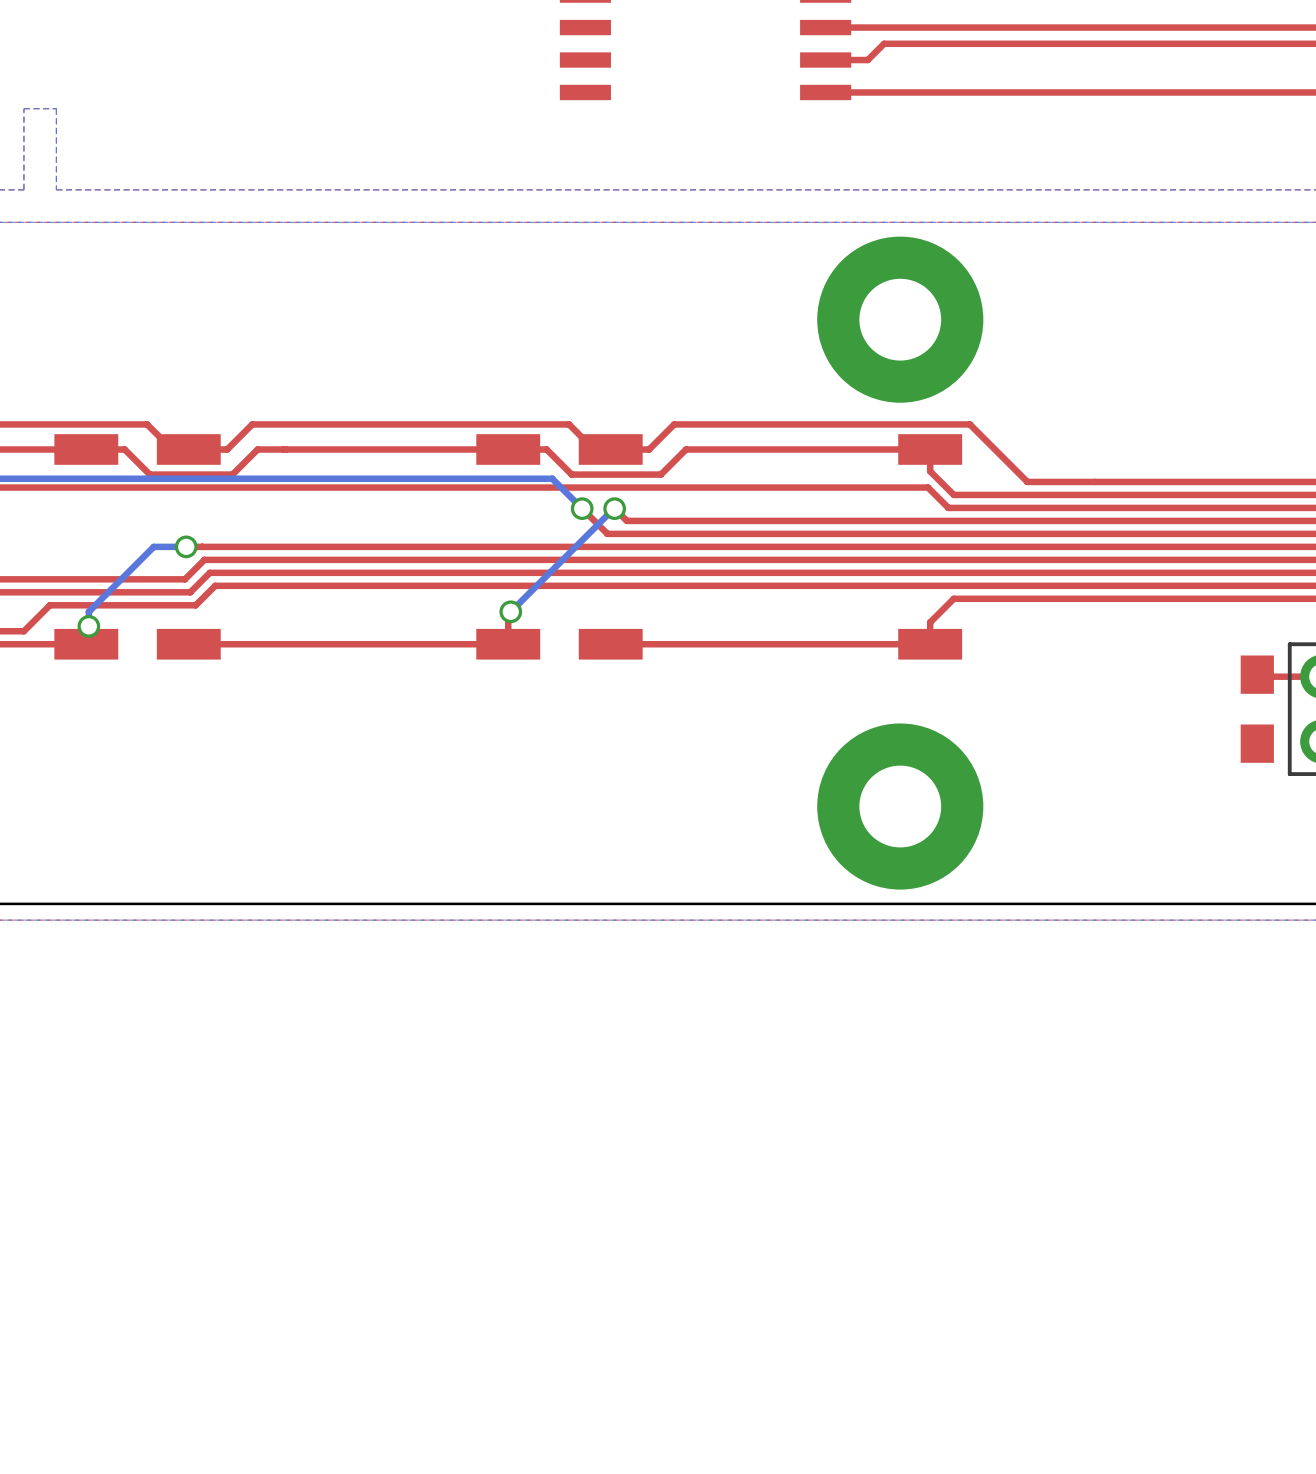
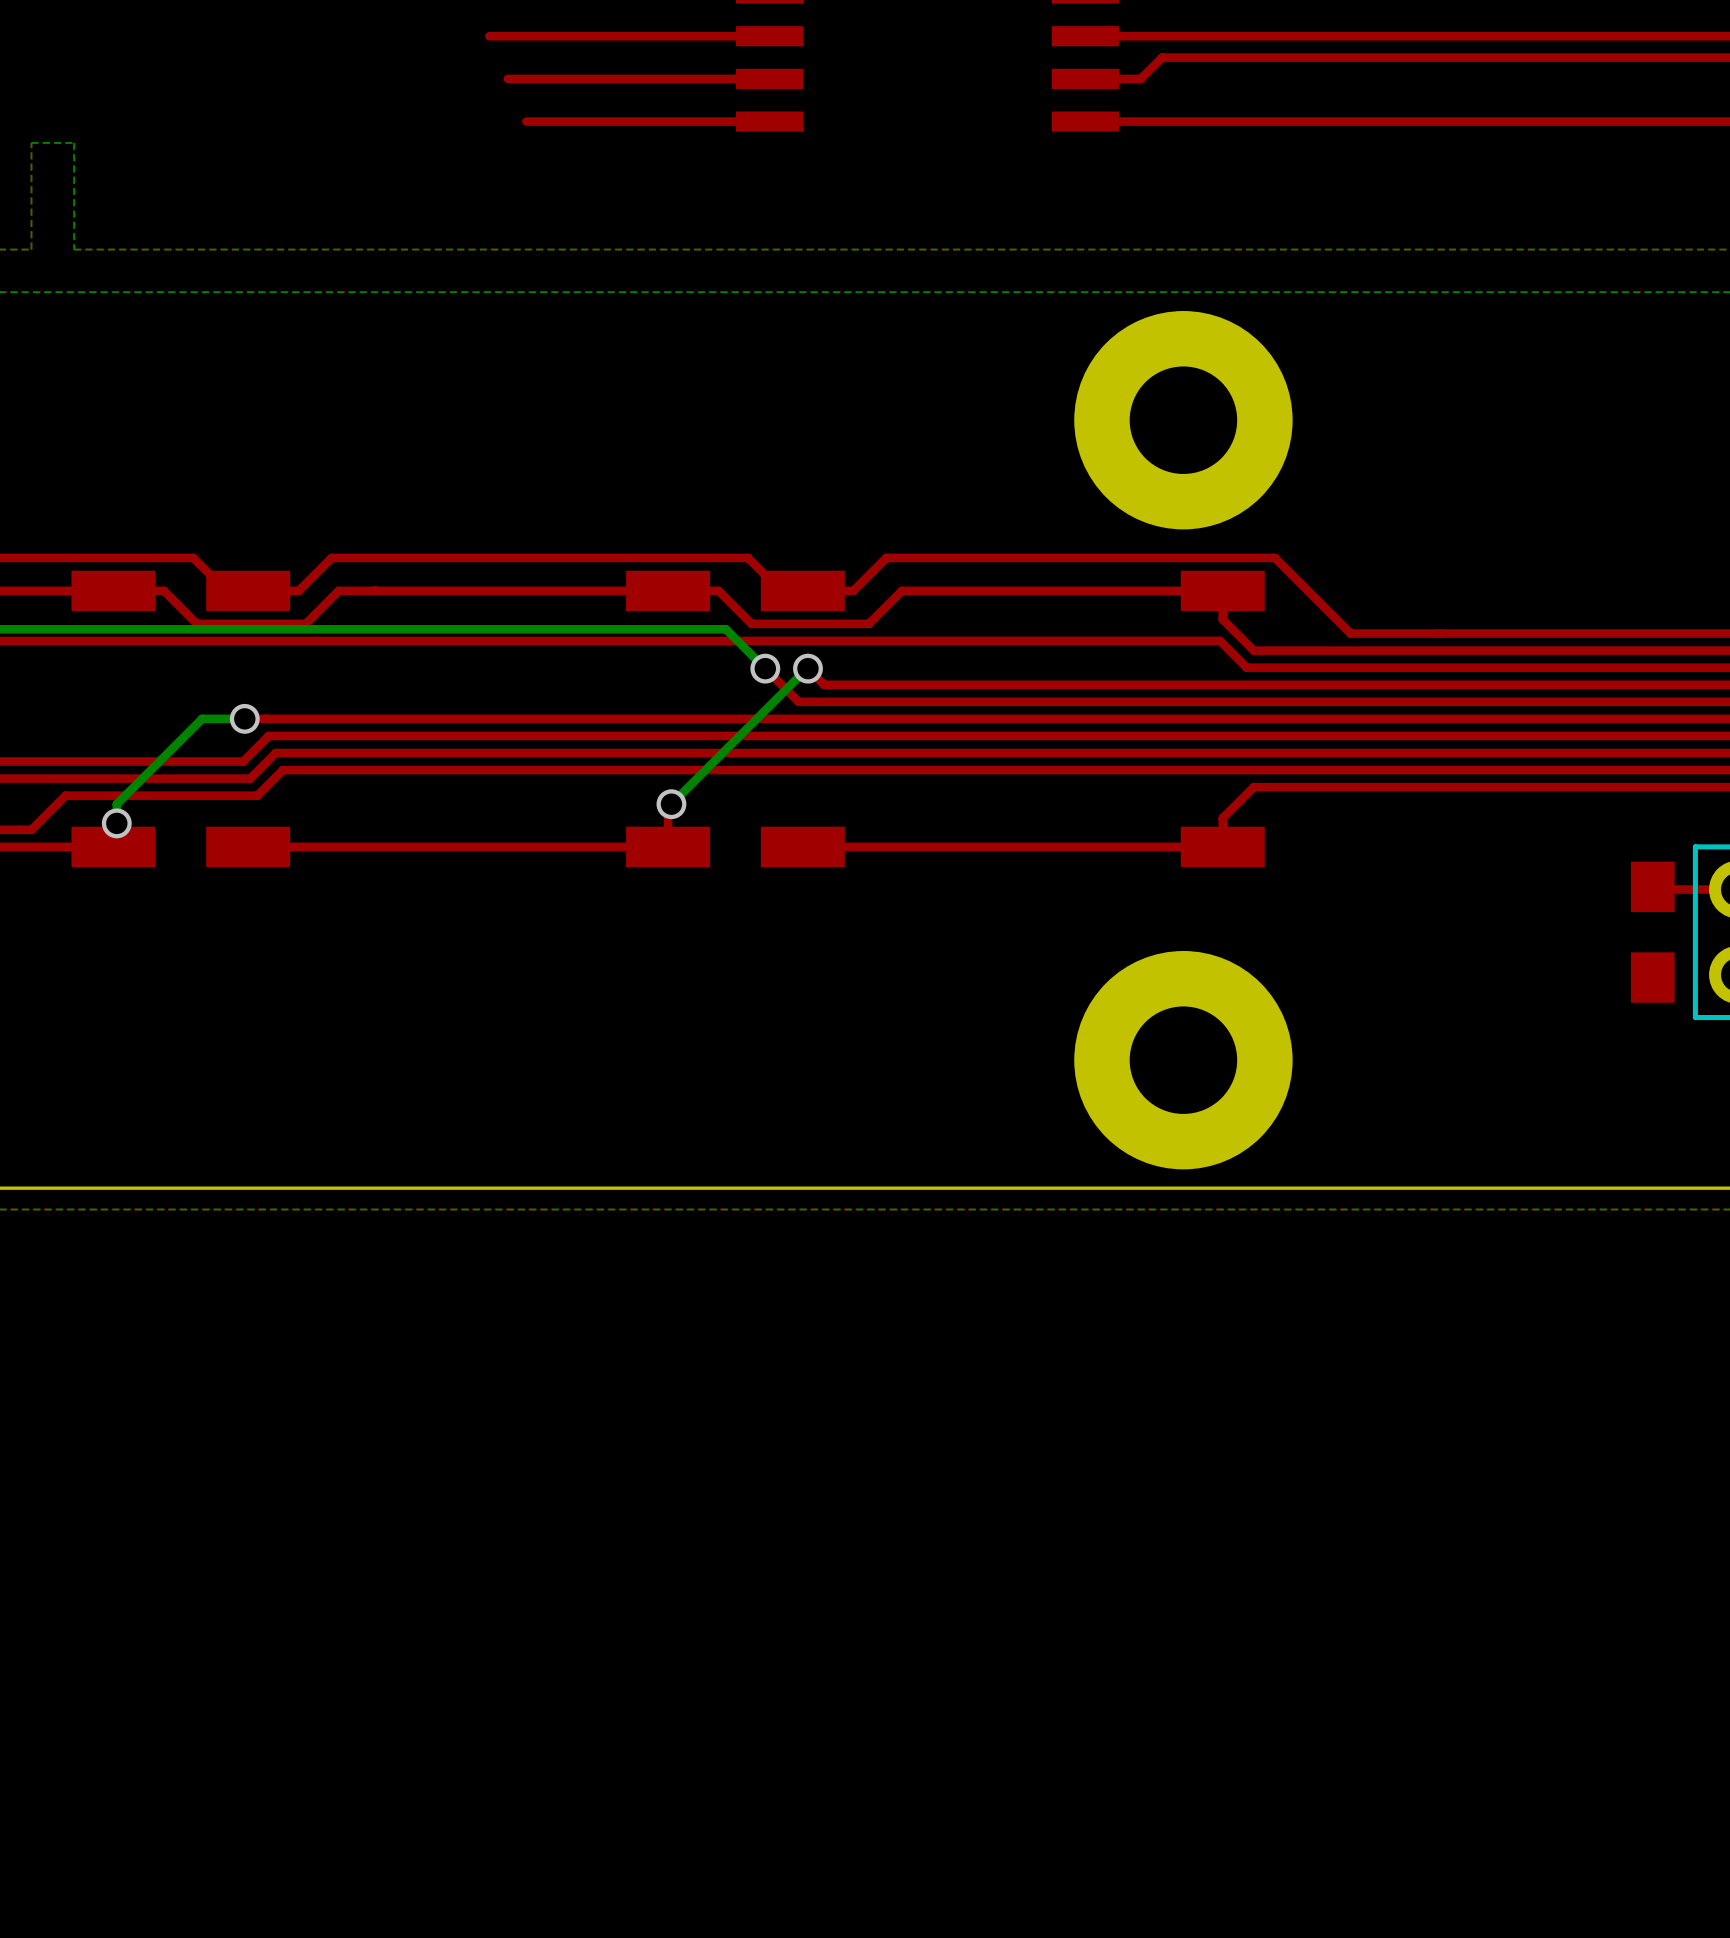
top track: none -> (769, 36) (489, 36)
top track: none -> (769, 78) (507, 78)
top track: none -> (746, 121) (526, 121)

